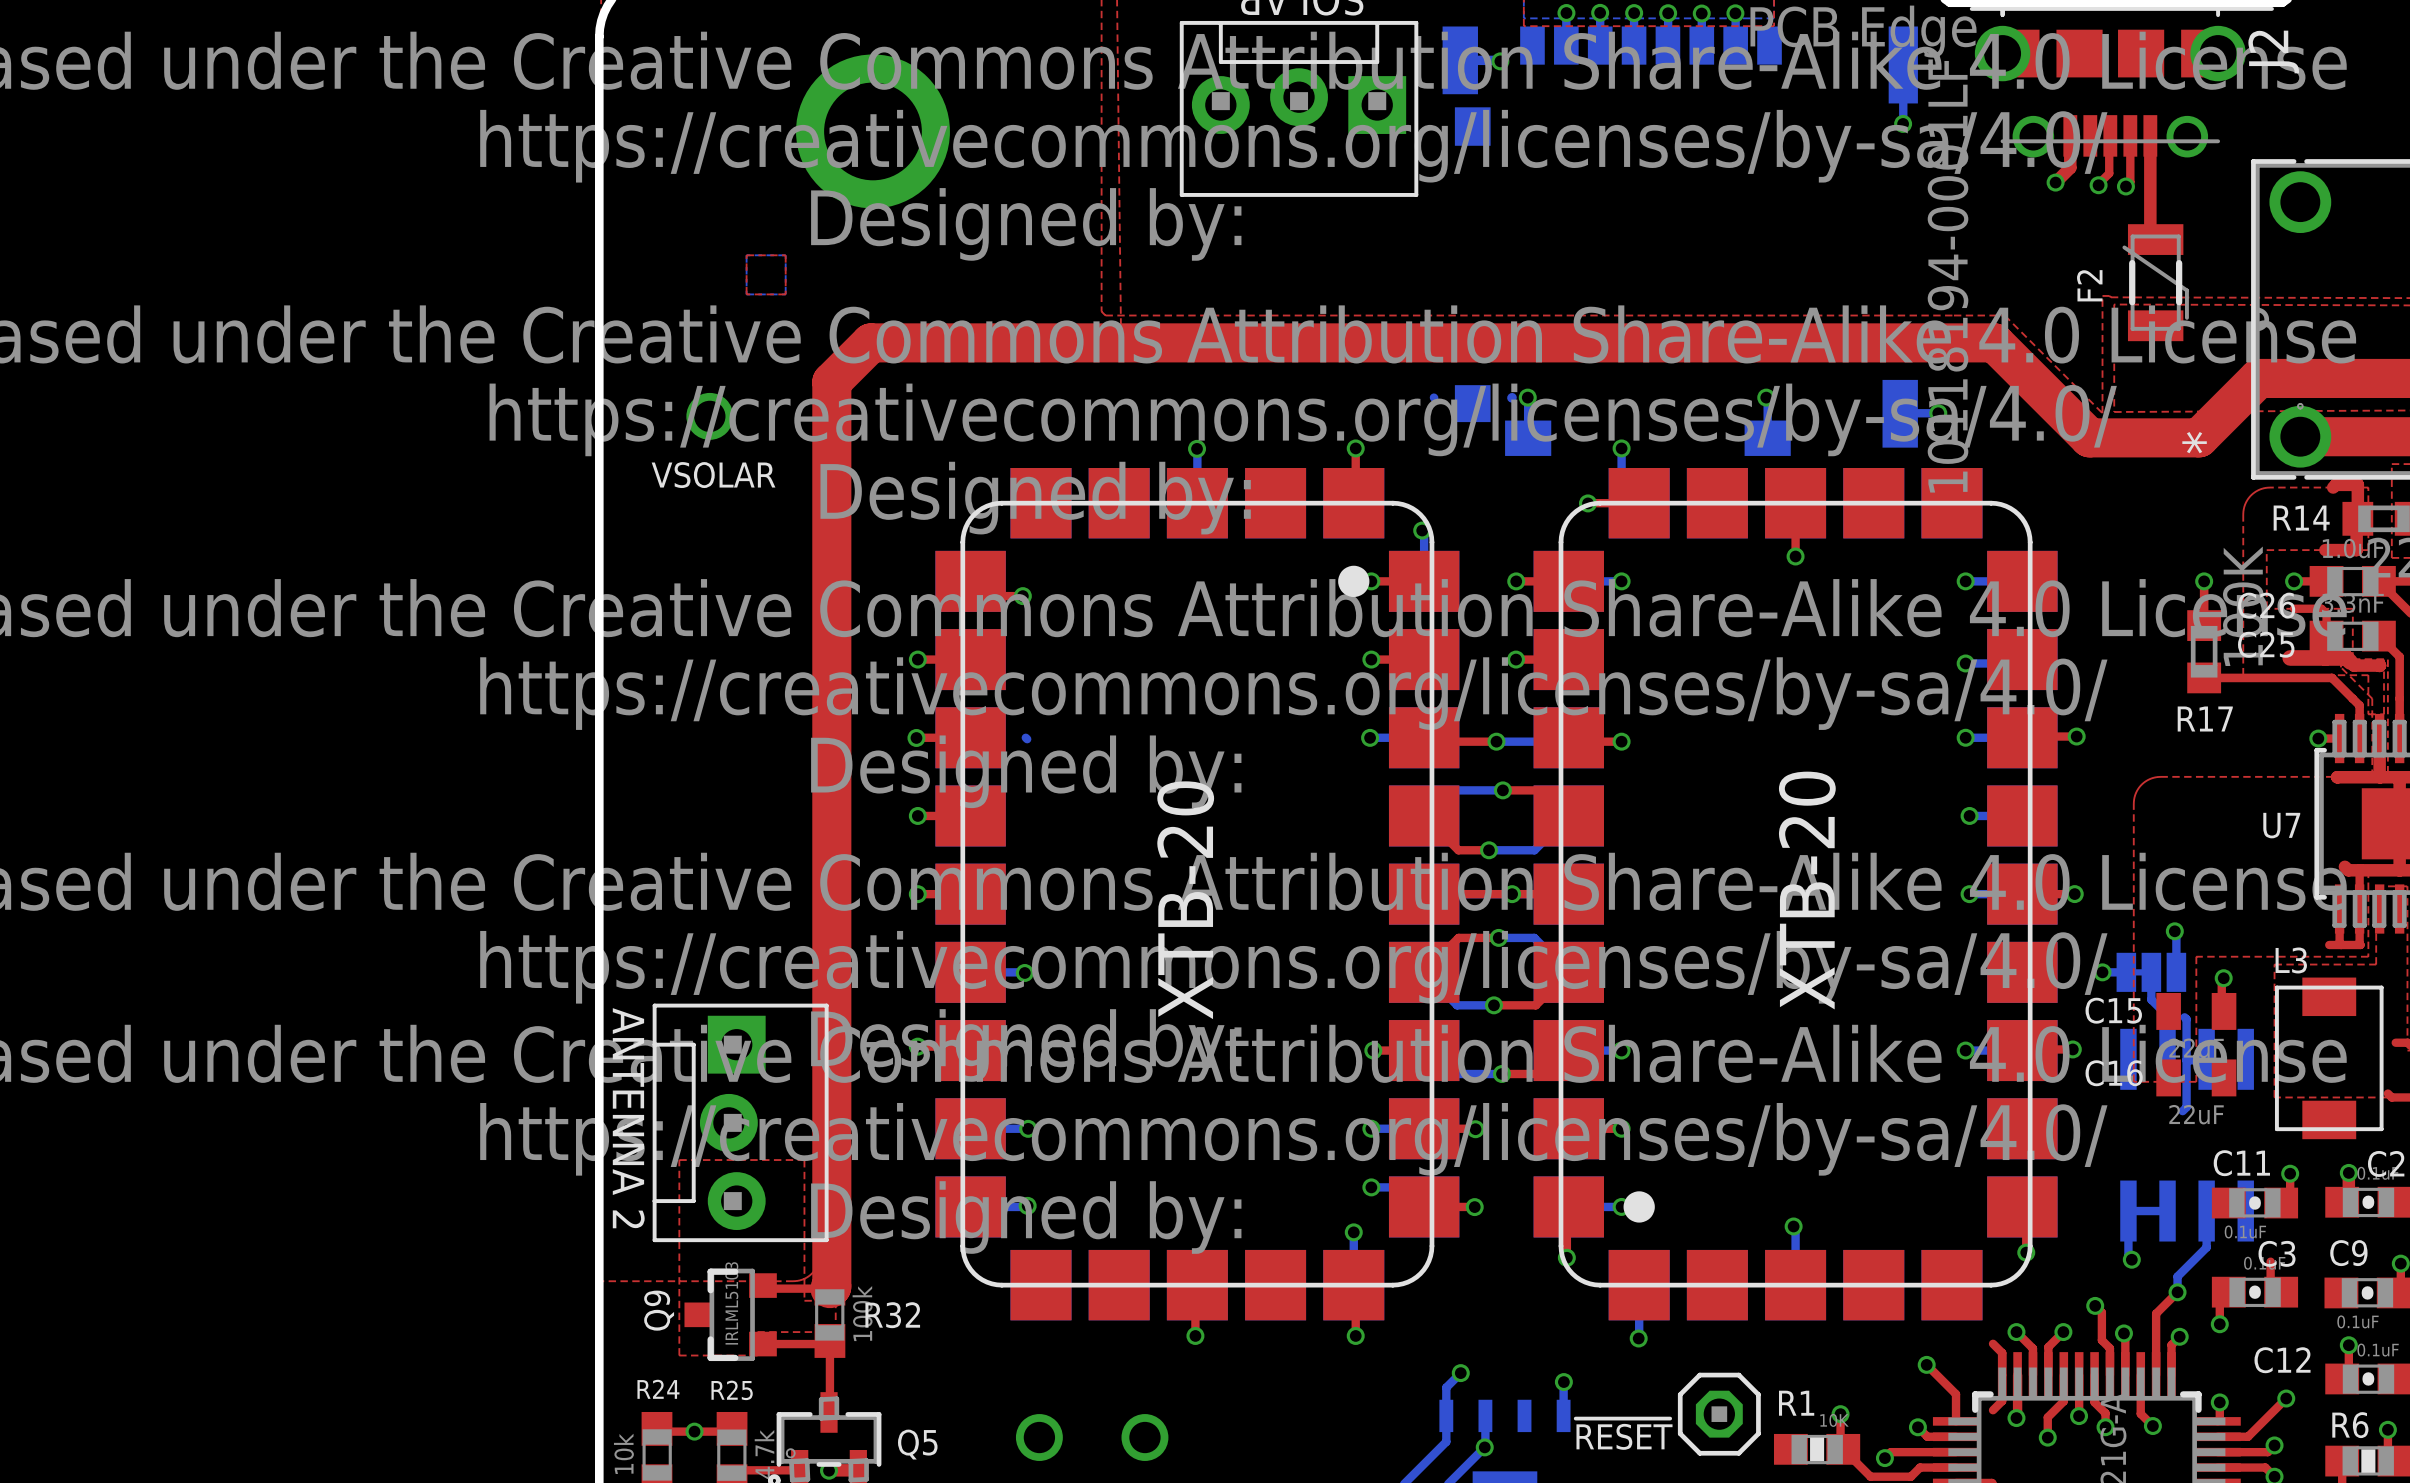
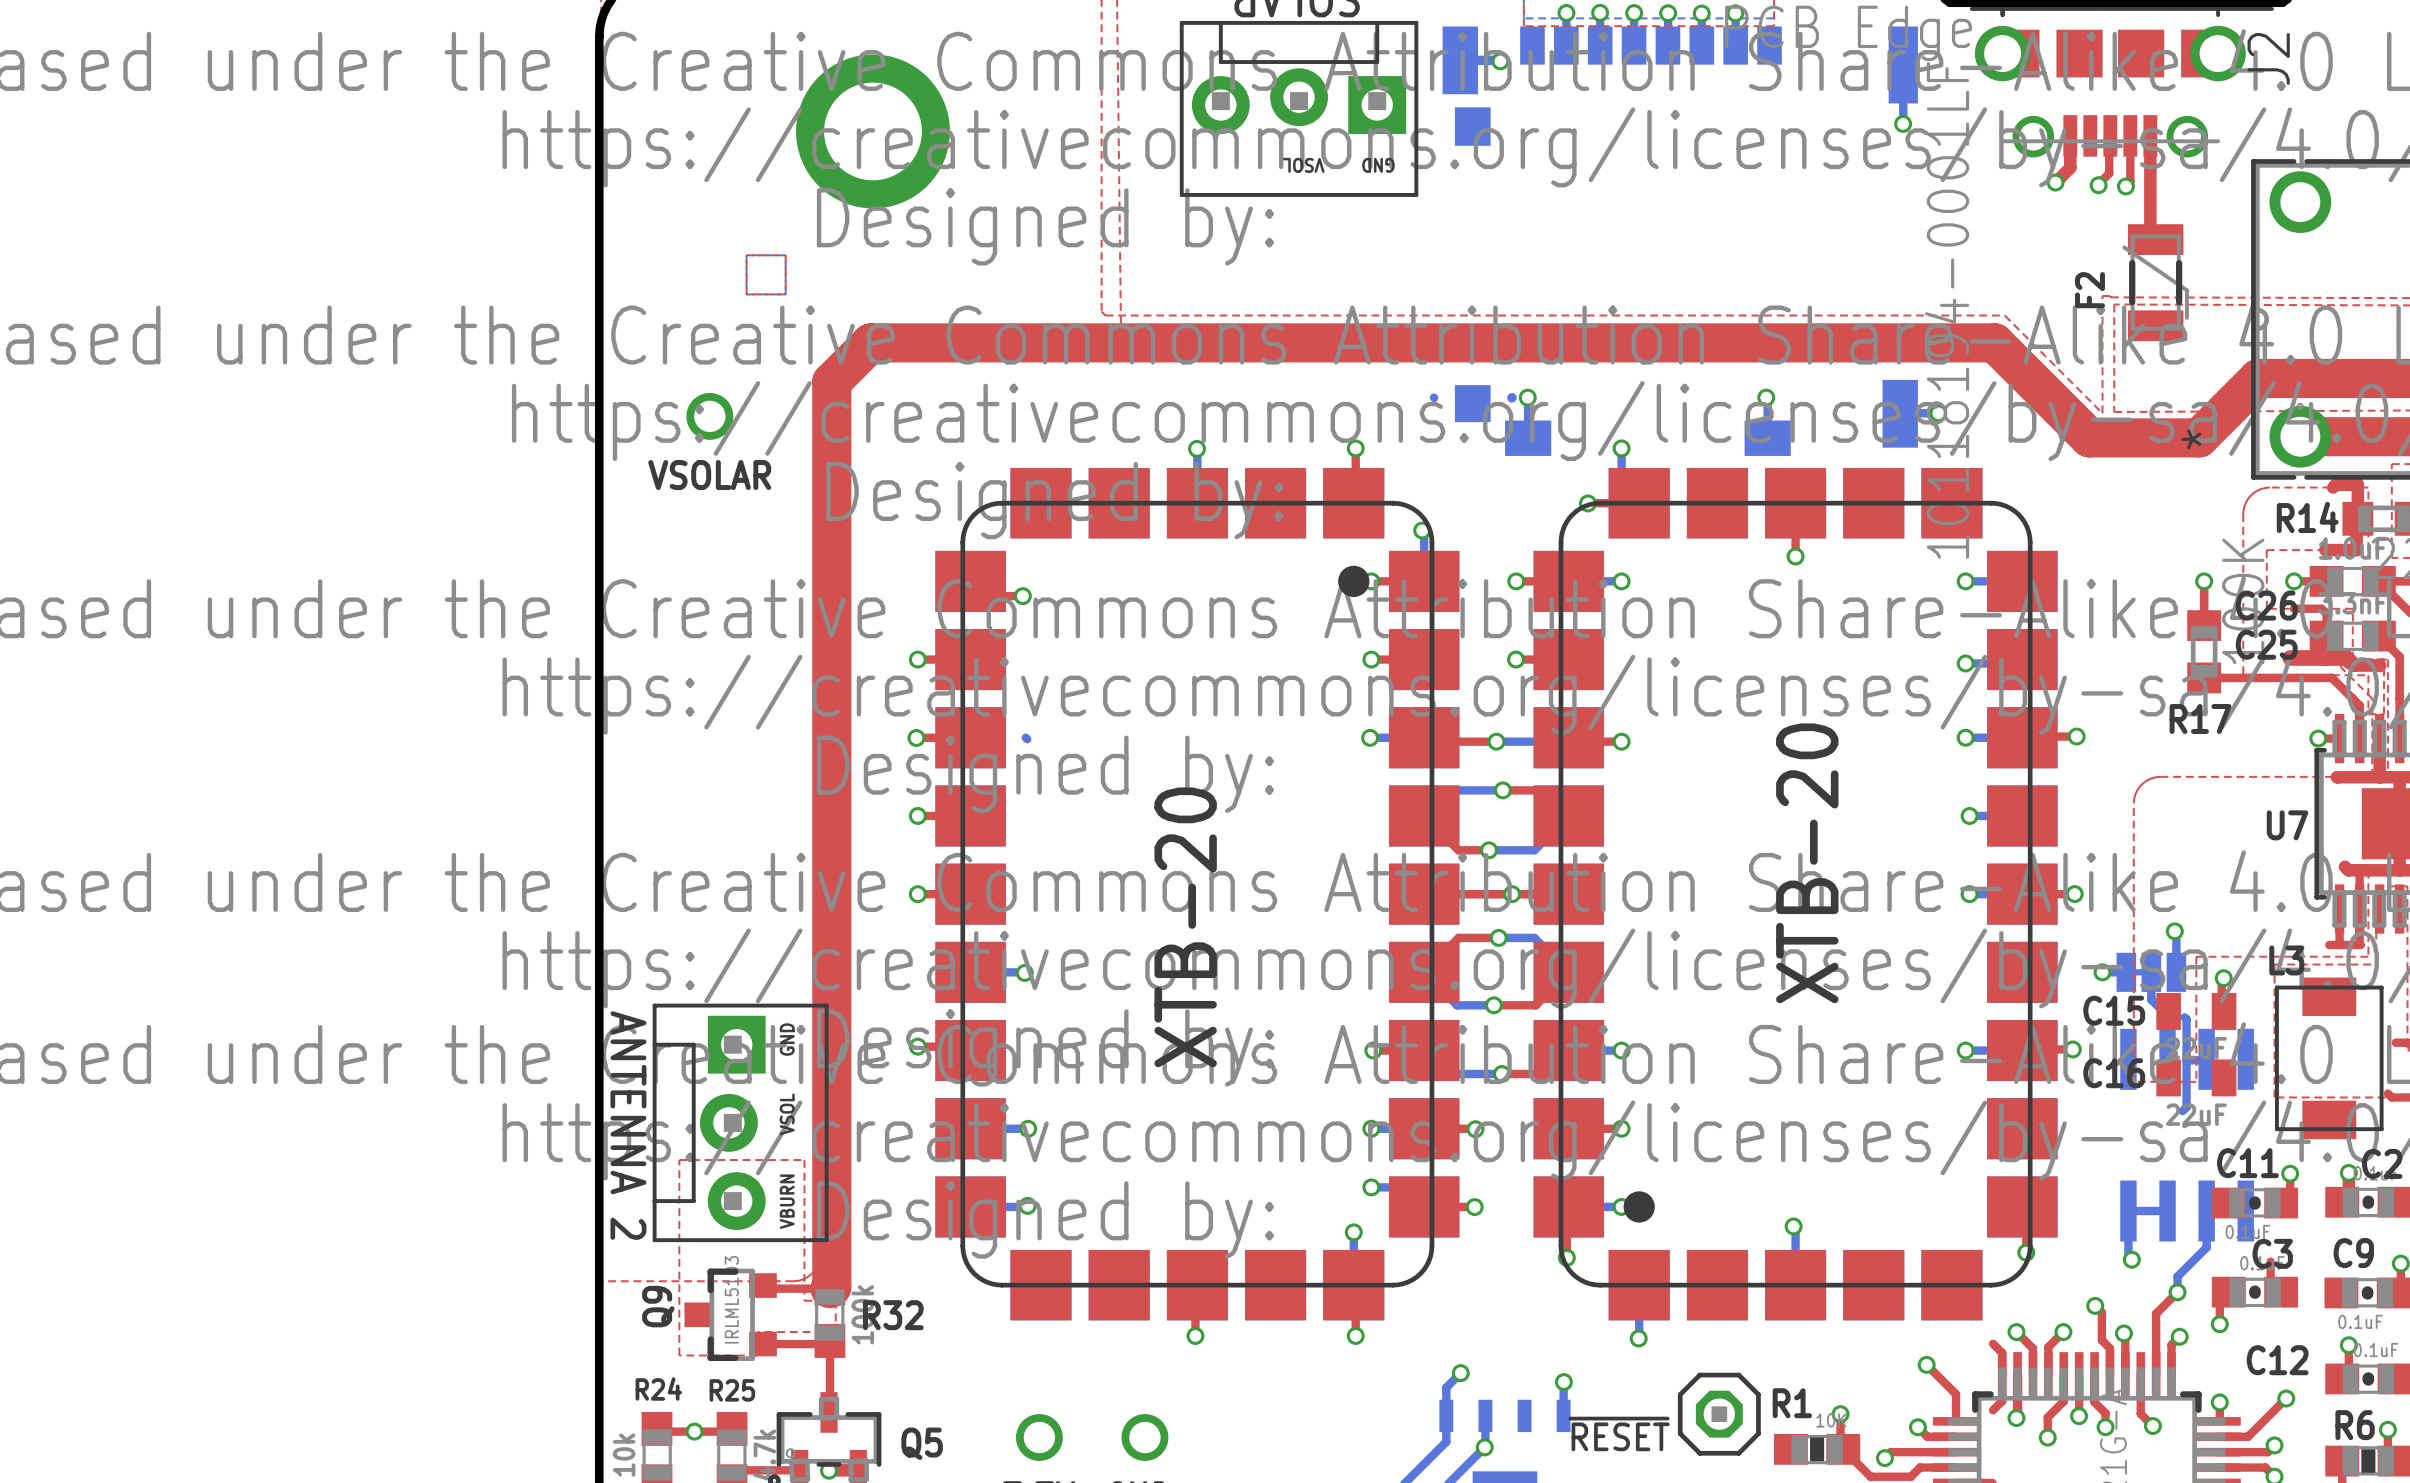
text: none -> VSOL (1303, 165)
text: none -> GND (1378, 165)
text: none -> GND (787, 1039)
text: none -> VSOL (787, 1114)
text: none -> VBURN (787, 1201)

